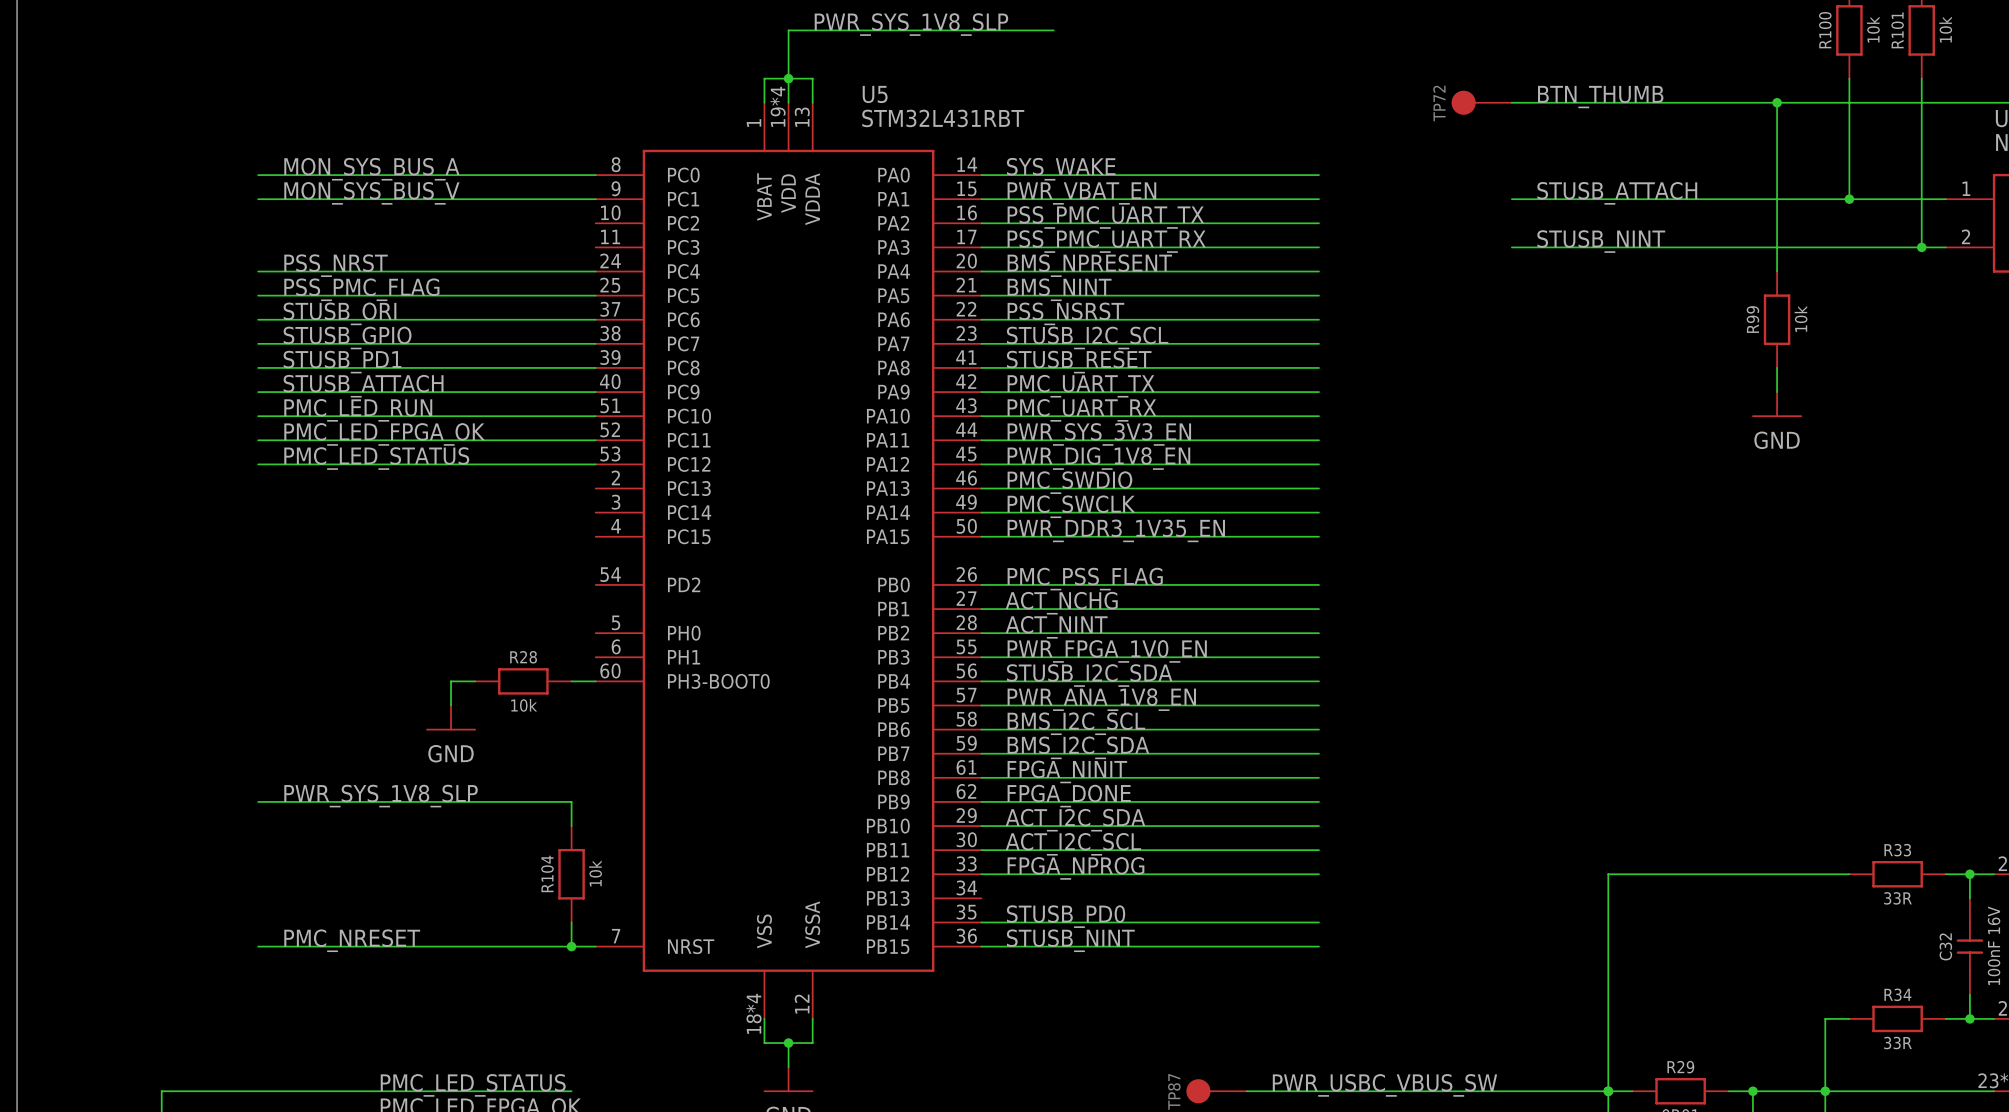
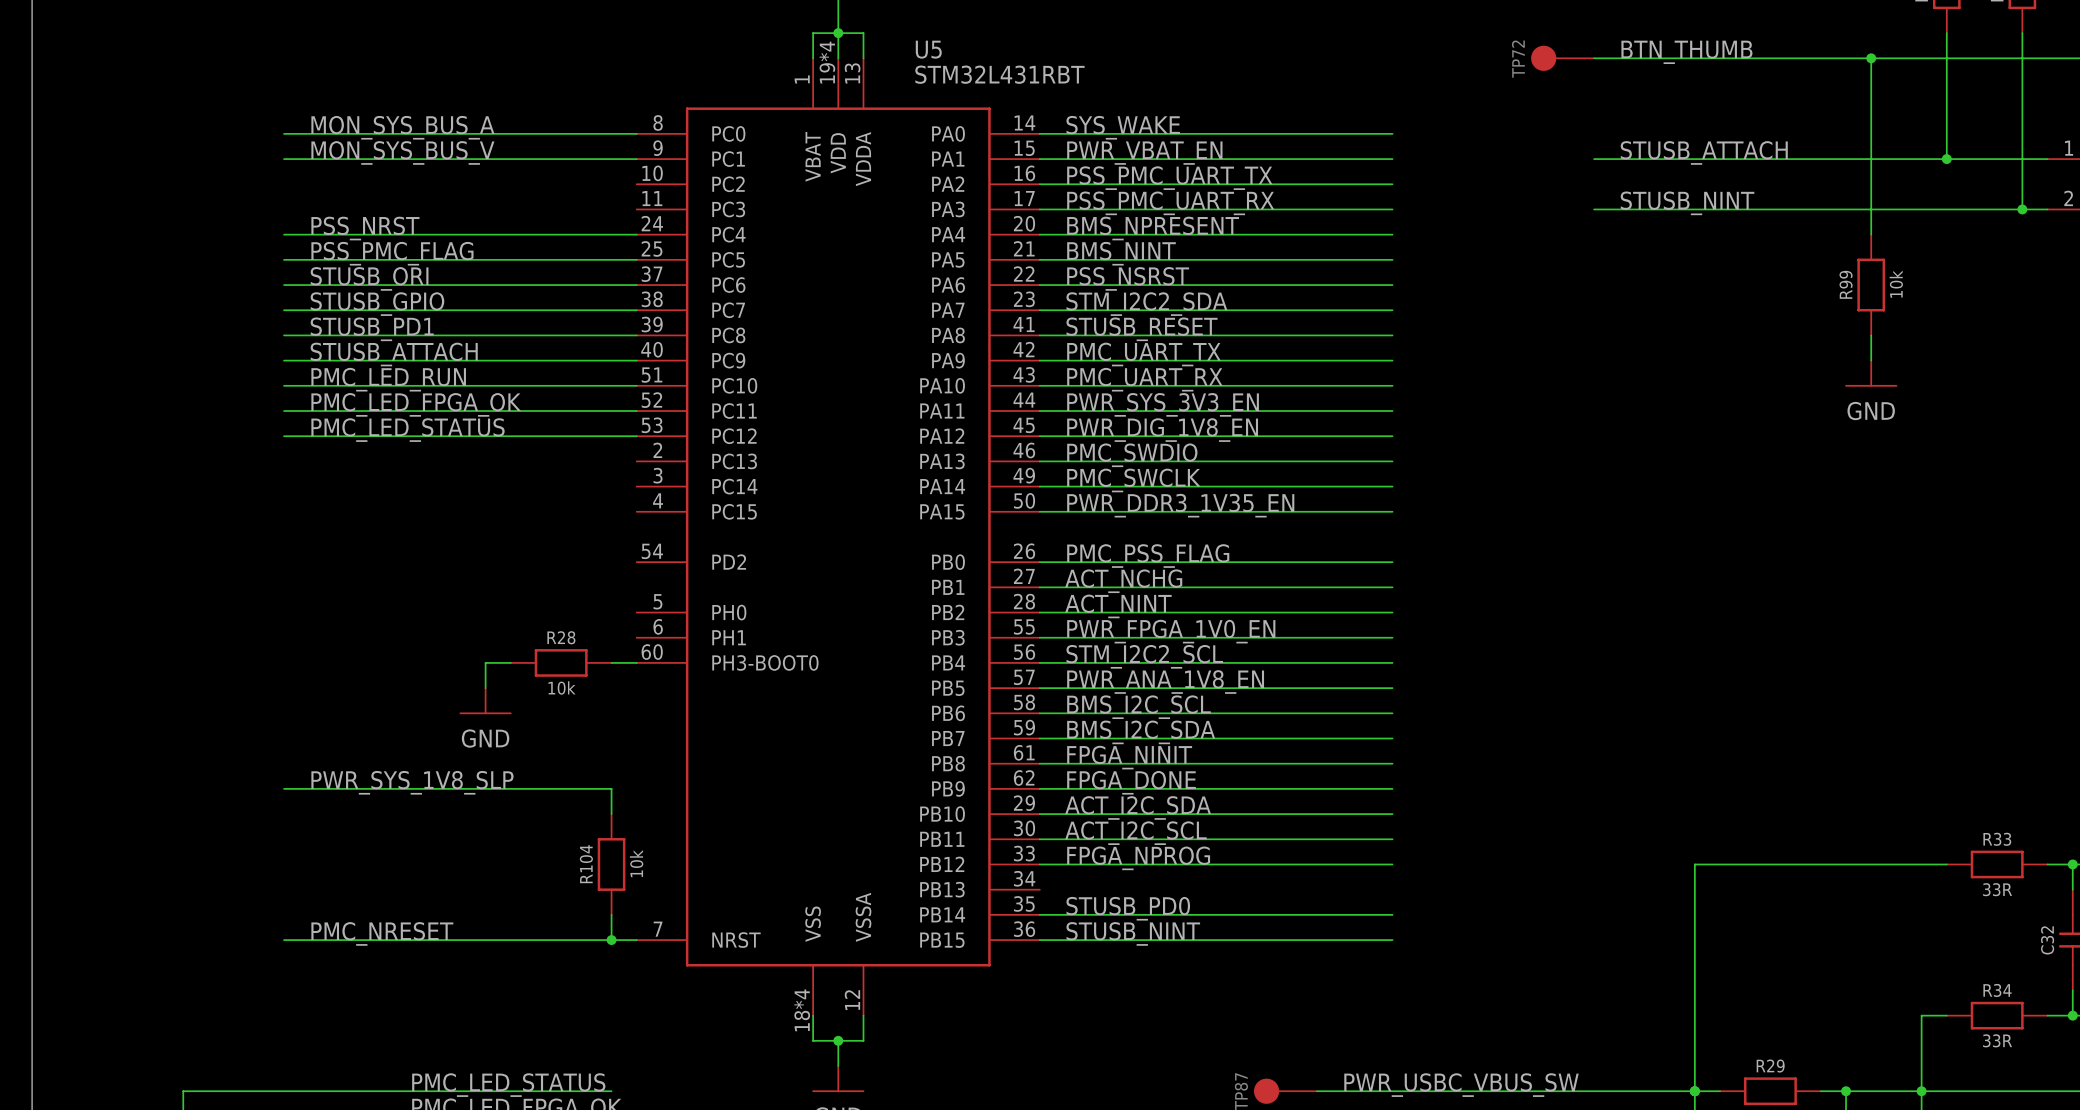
label: STUSB_I2C_SCL (1087, 337) -> STM_I2C2_SDA (1146, 304)
label: STUSB_I2C_SDA (1089, 675) -> STM_I2C2_SCL (1144, 656)

